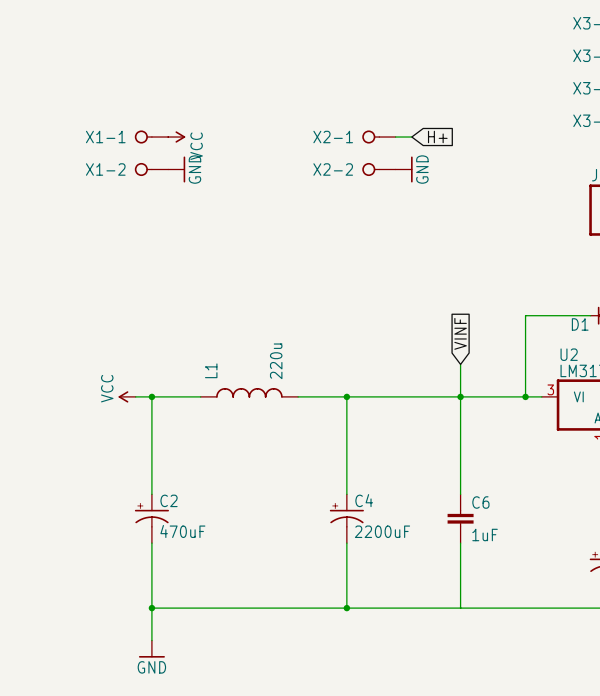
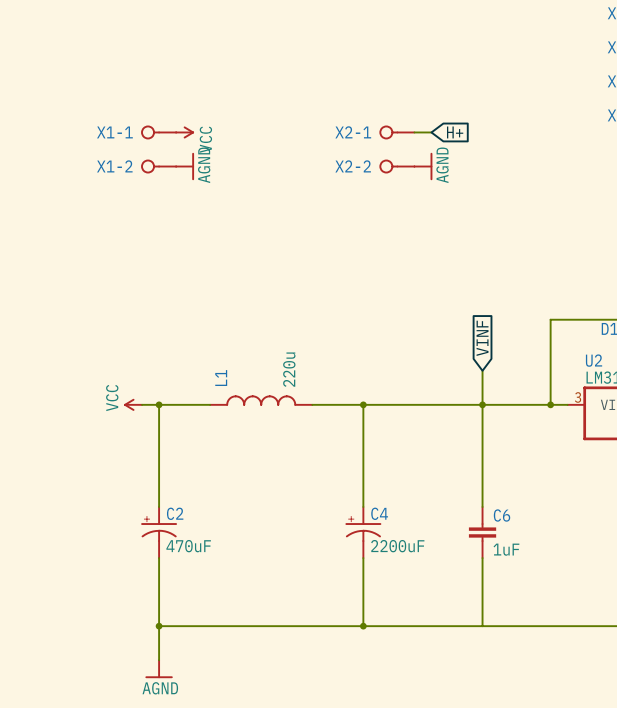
power symbol: GND (176, 169) -> AGND (185, 166)
power symbol: GND (404, 169) -> AGND (423, 166)
power symbol: GND (151, 649) -> AGND (159, 669)

